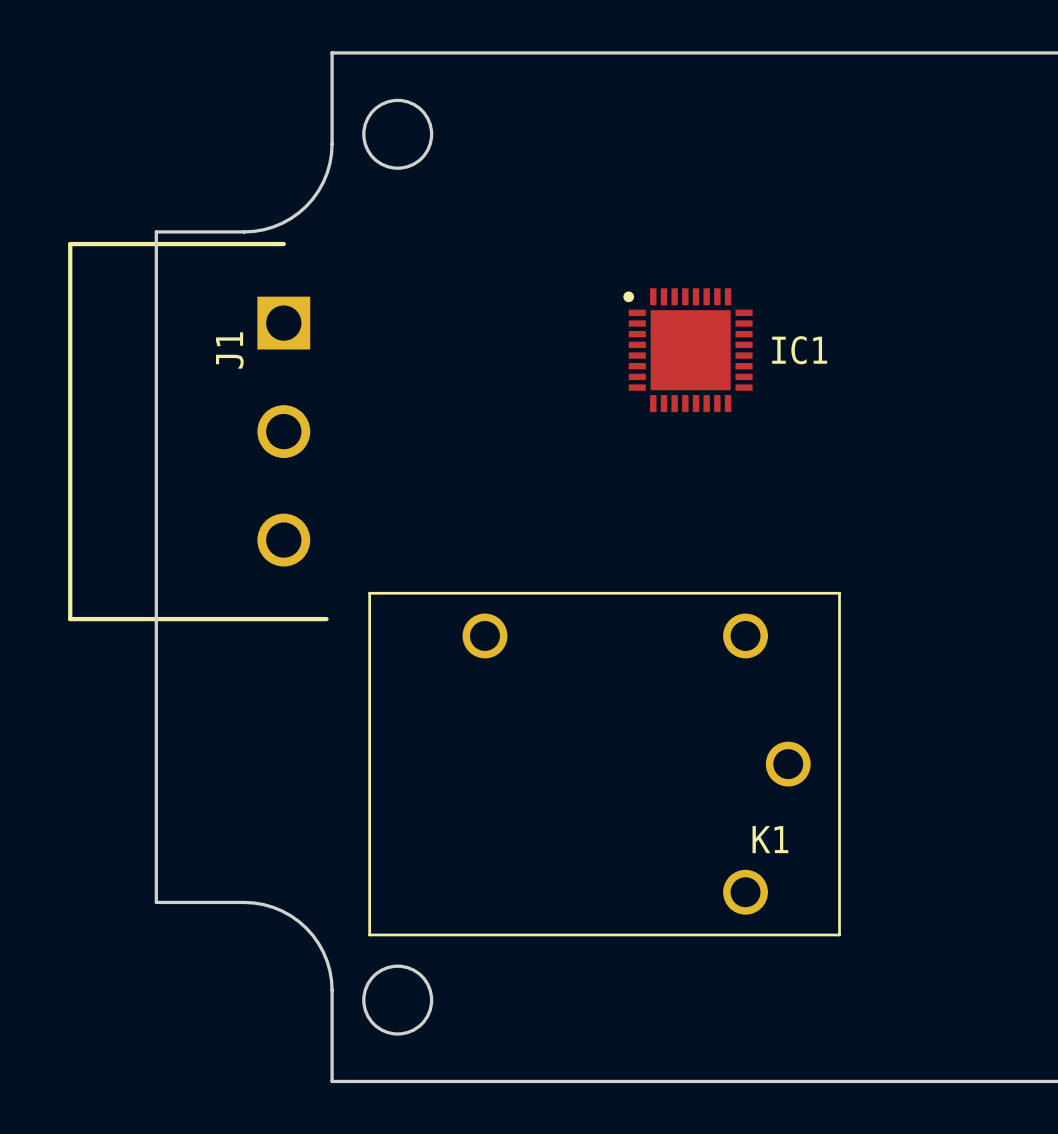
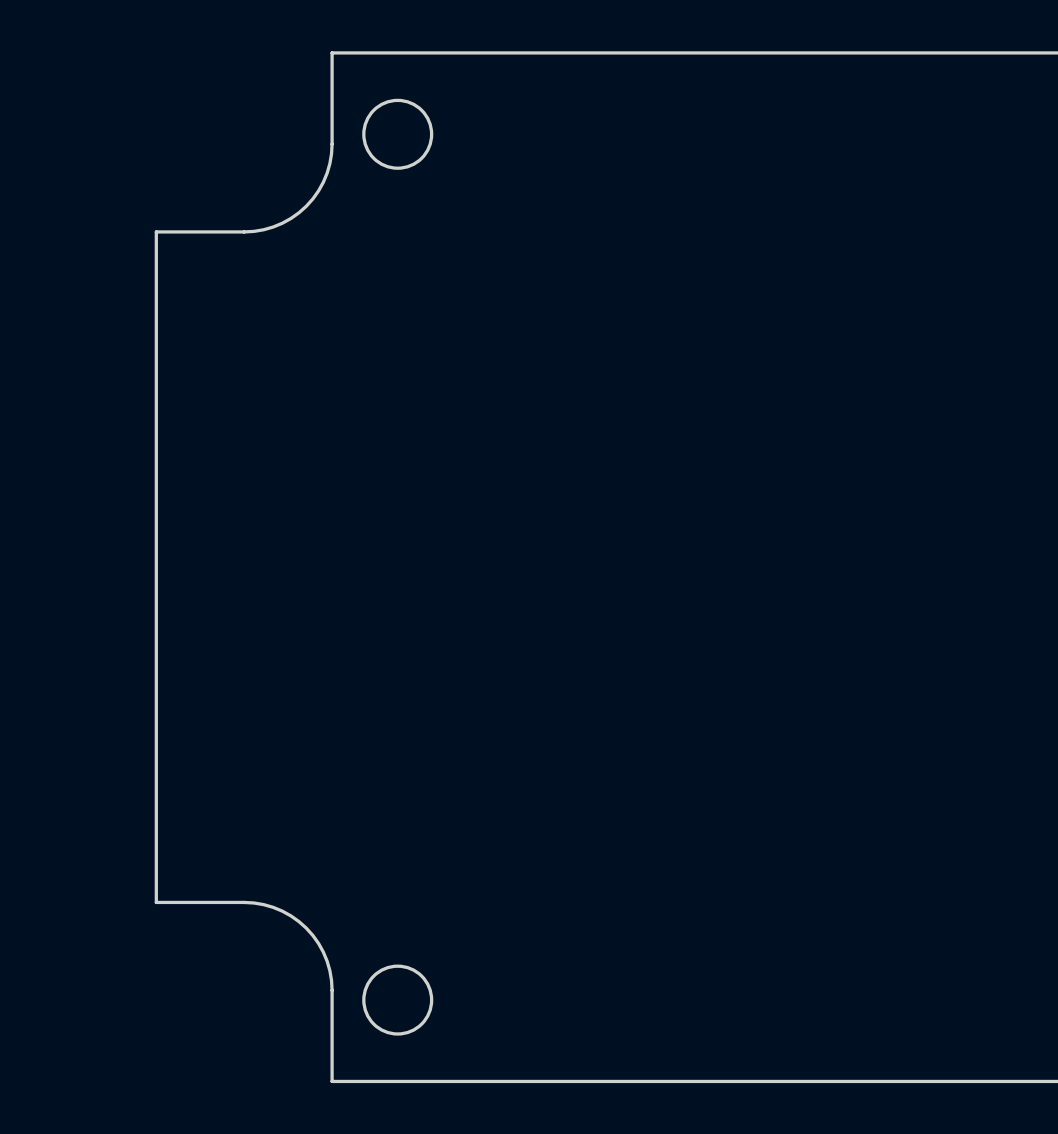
IC1: (687, 350) -> none
J1: (198, 431) -> none
K1: (604, 764) -> none

